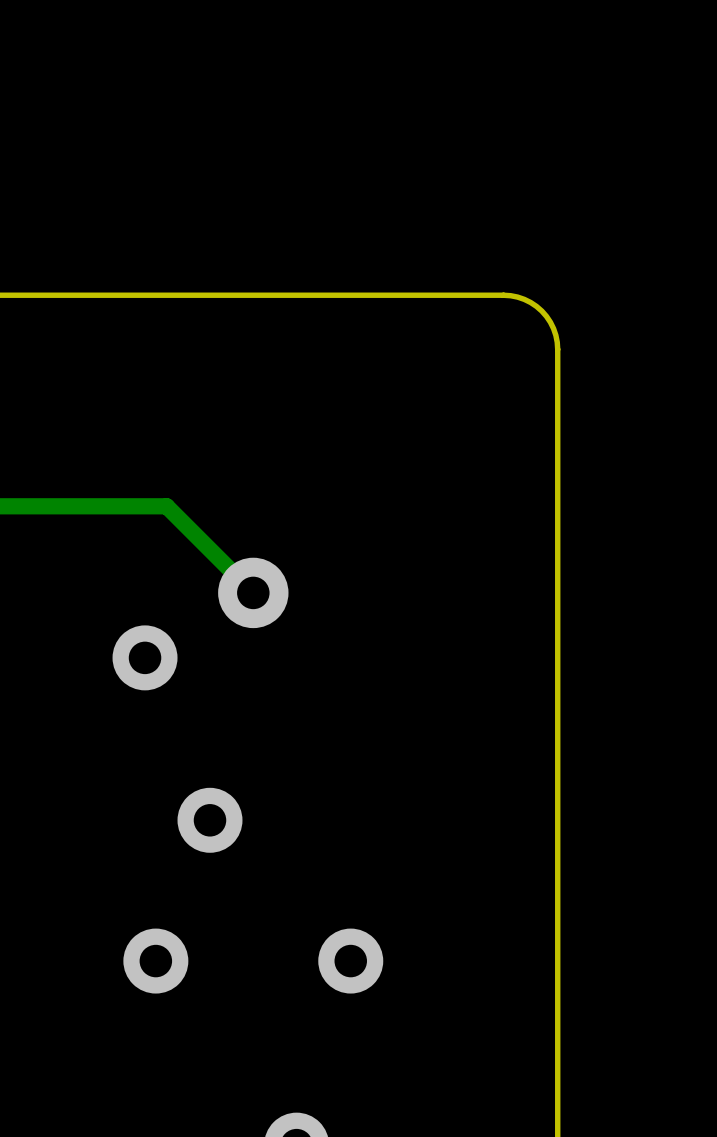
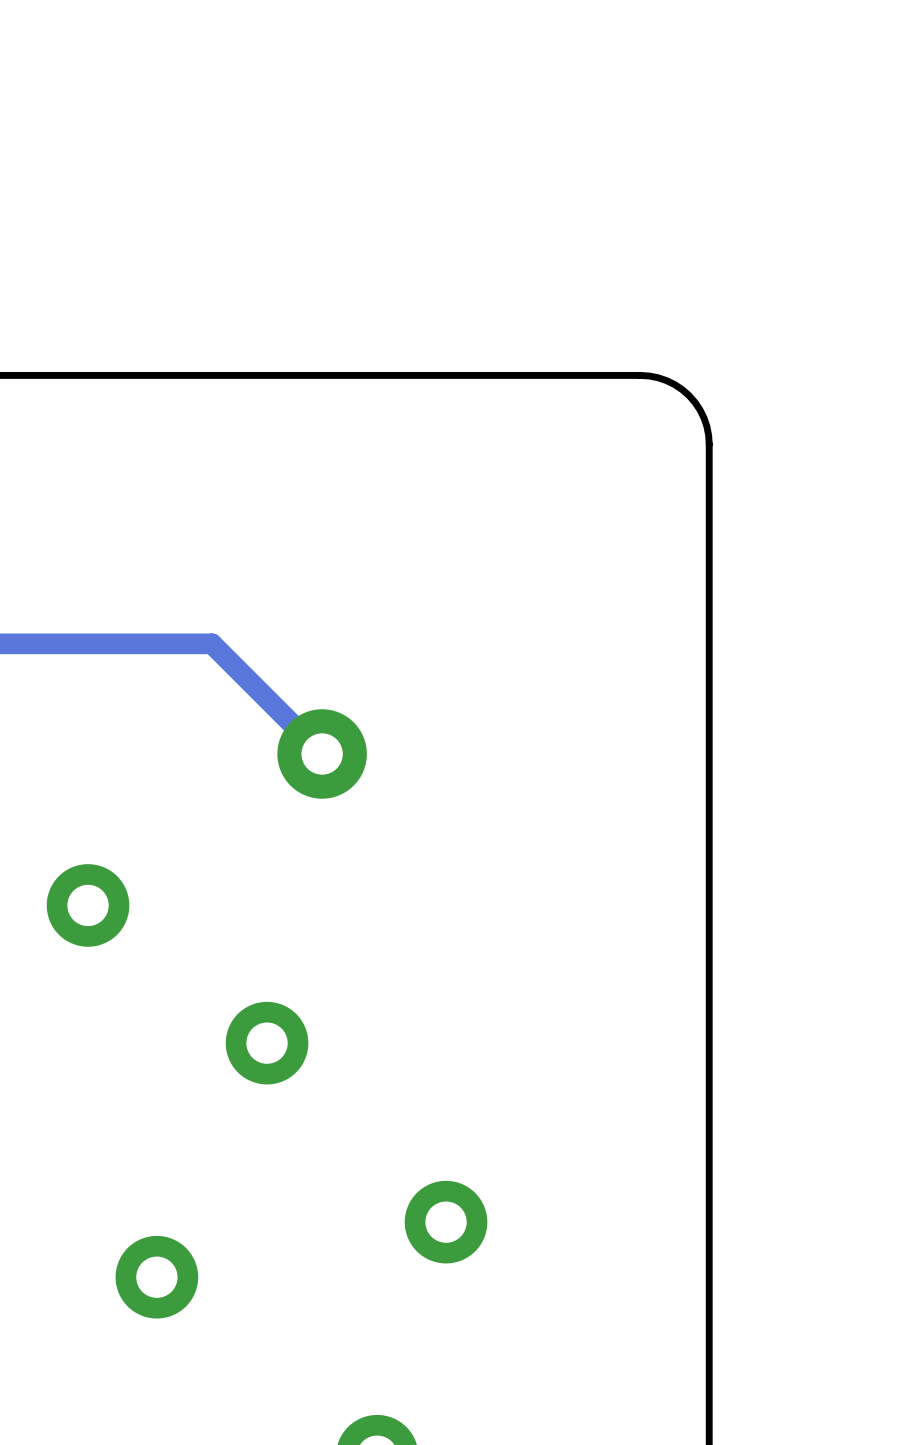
via: (145, 657) -> none
via: none -> (88, 905)
via position: (155, 961) -> (156, 1277)

